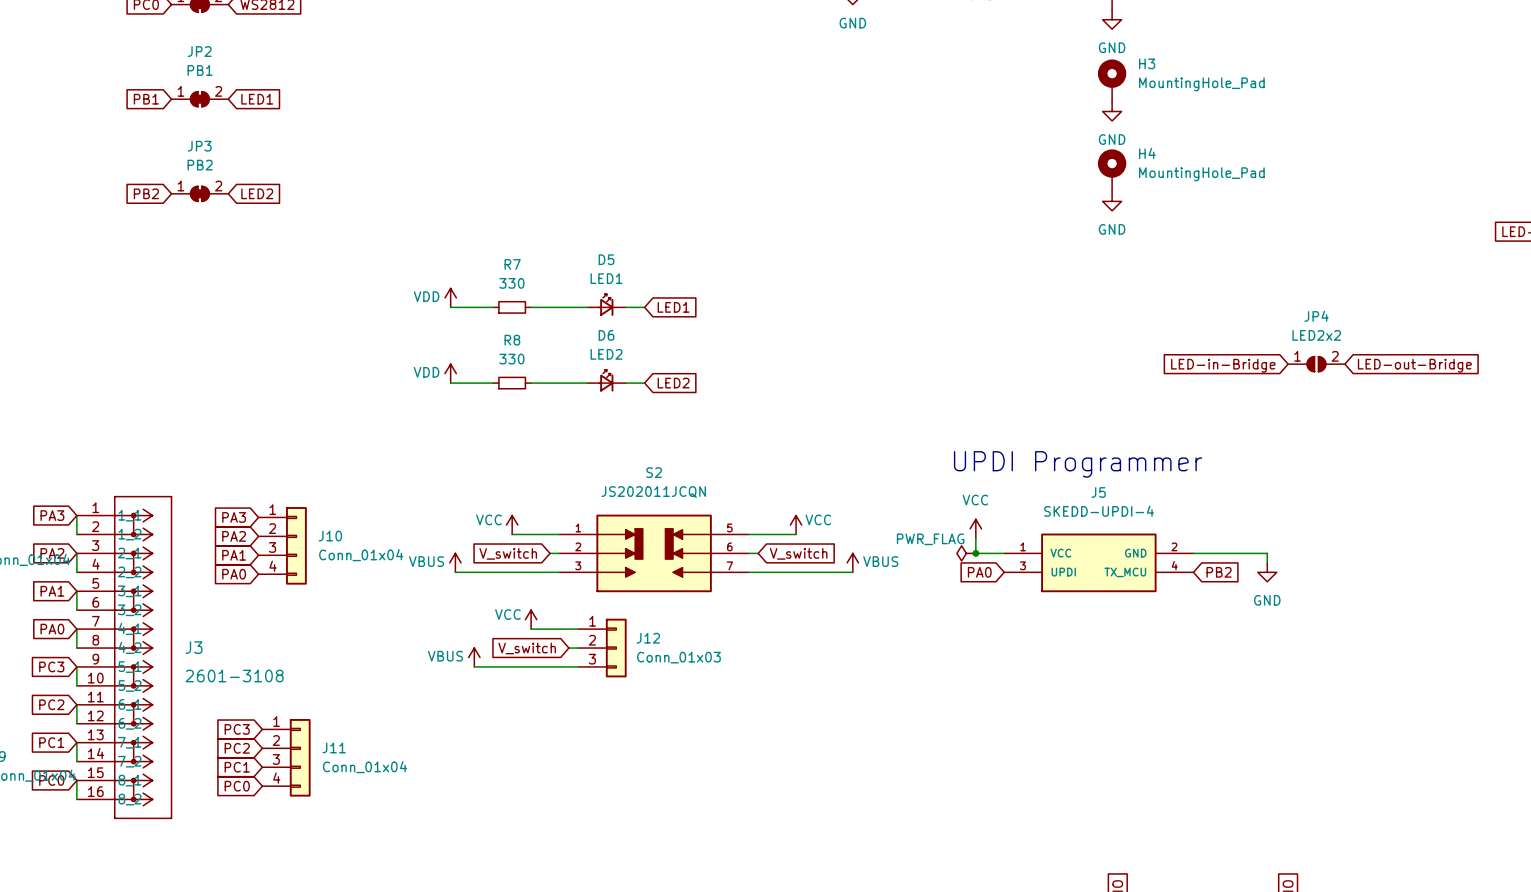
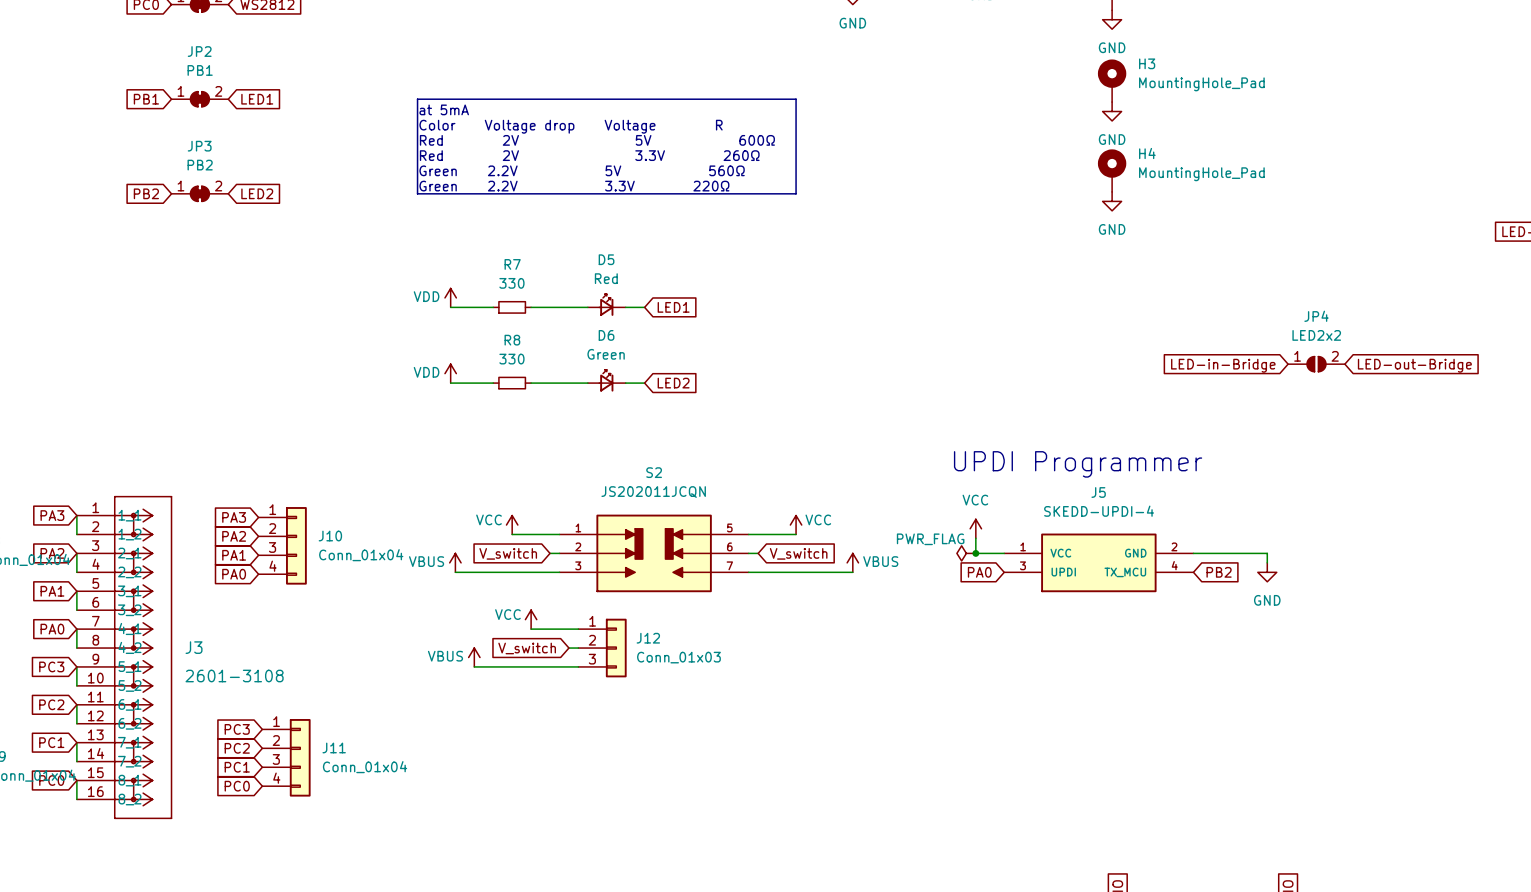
line: none -> (417, 99) (417, 193) (796, 193) (796, 99) (417, 99)
text: none -> at 5mA (444, 109)
text: none -> Color Voltage drop Voltage R (571, 126)
text: none -> Red 2V 5V 600Ω (597, 140)
text: none -> Red 2V 3.3V 260Ω (589, 155)
text: none -> Green 2.2V 5V 560Ω (582, 170)
text: none -> Green 2.2V 3.3V 220Ω (574, 186)
D5 value: LED1 (606, 278) -> Red (606, 278)
D6 value: LED2 (606, 354) -> Green (606, 354)

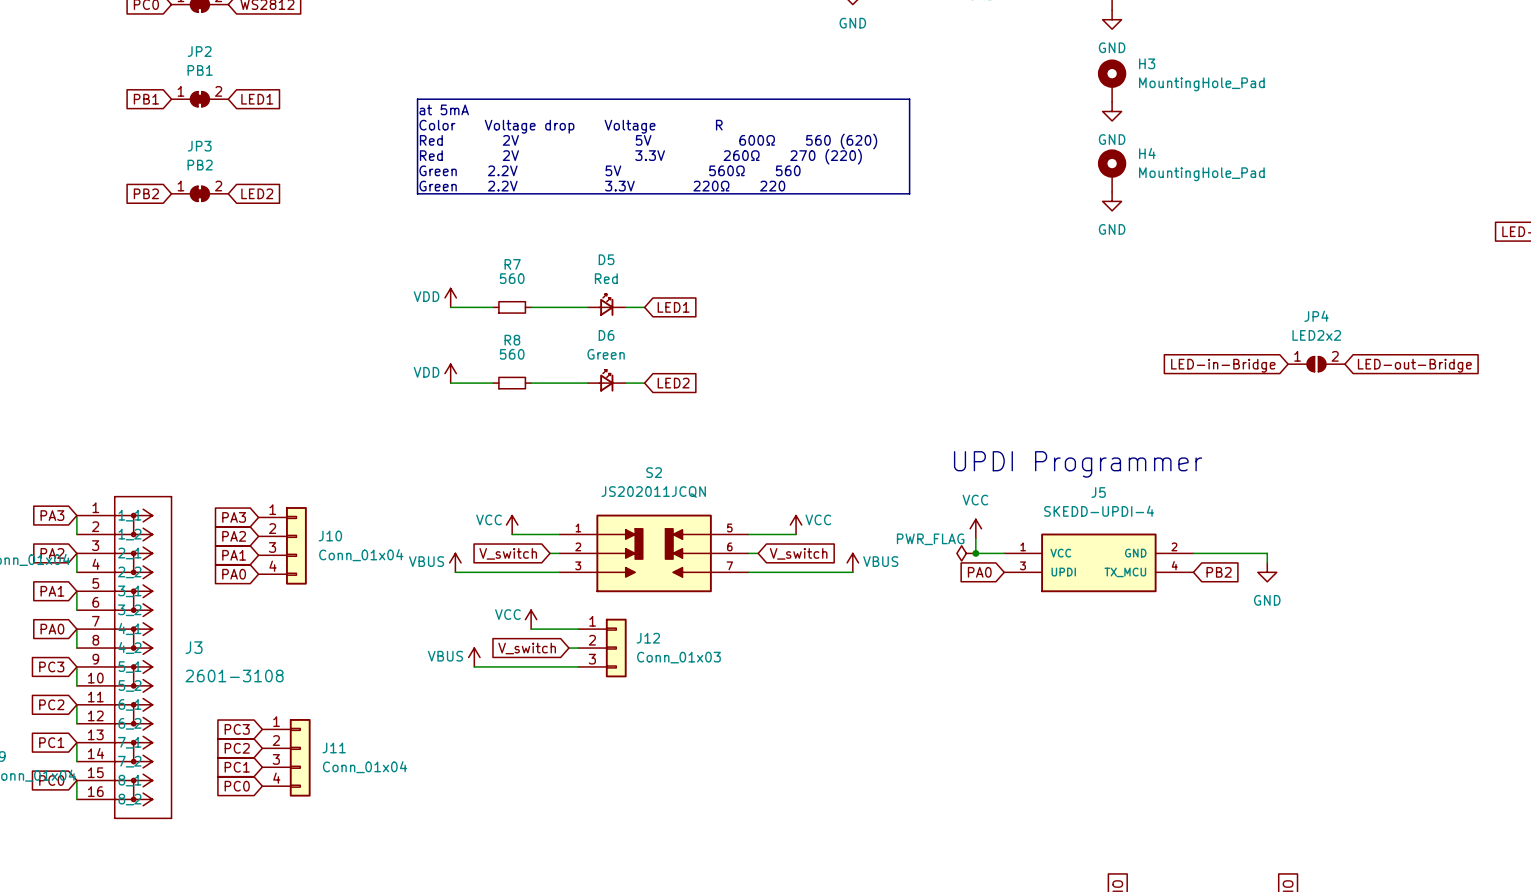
line: (796, 99) (796, 193) -> (796, 99) (909, 99) (909, 193) (796, 193)
text: Red 2V 5V 600Ω (597, 140) -> Red 2V 5V 600Ω 560 (620) (648, 141)
text: Red 2V 3.3V 260Ω (589, 155) -> Red 2V 3.3V 260Ω 270 (220) (640, 156)
text: Green 2.2V 5V 560Ω (582, 170) -> Green 2.2V 5V 560Ω 560 (610, 170)
text: Green 2.2V 3.3V 220Ω (574, 186) -> Green 2.2V 3.3V 220Ω 220 (602, 186)
R7 value: 330 (511, 283) -> 560 (512, 278)
R8 value: 330 (511, 359) -> 560 (512, 354)

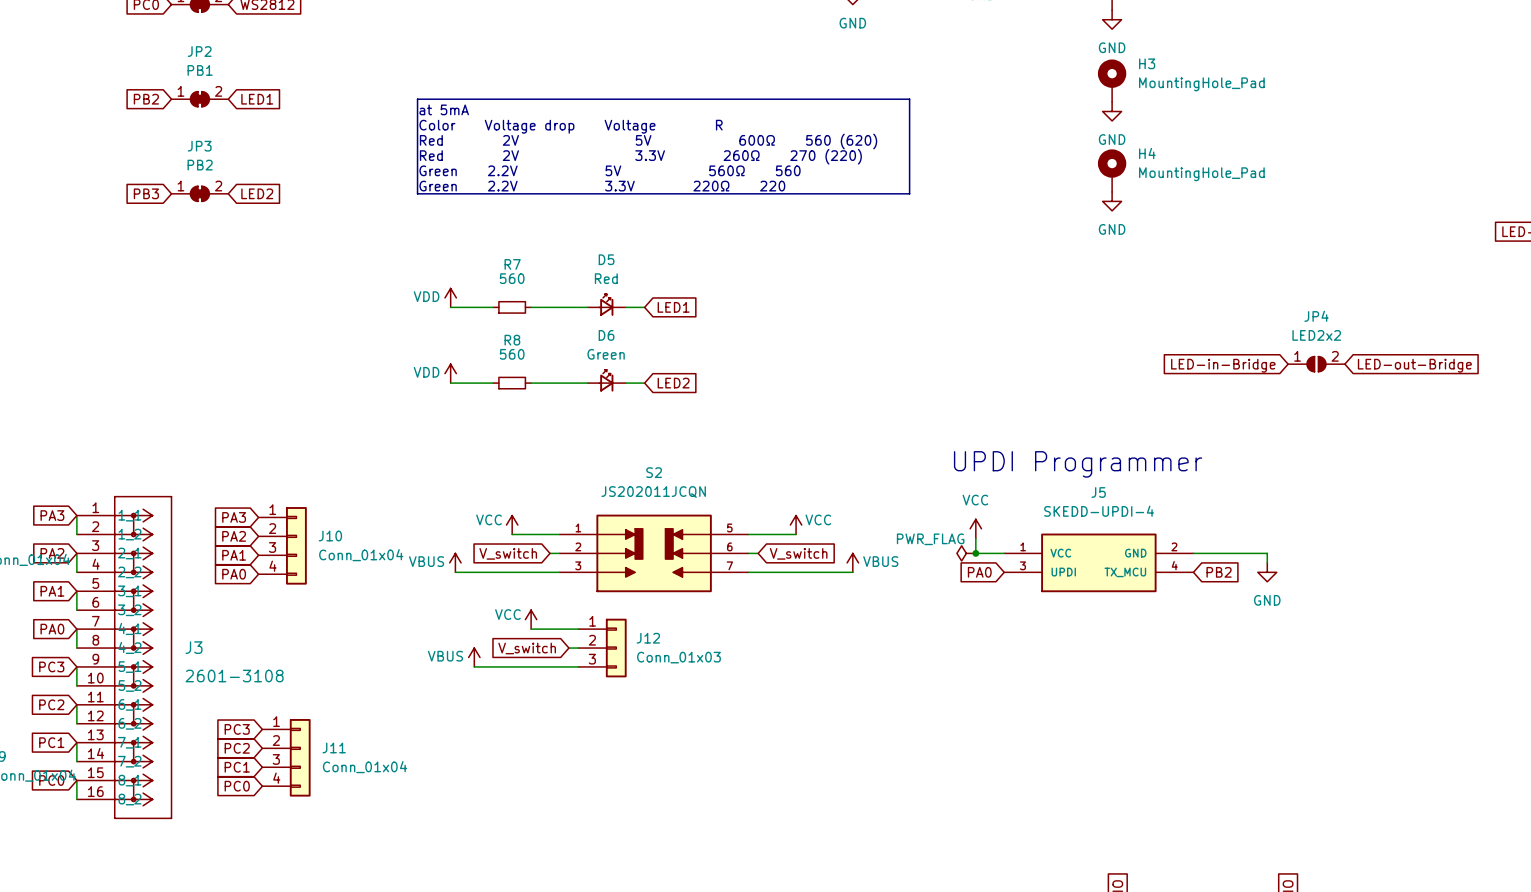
global label: PB1 (146, 99) -> PB2 (146, 99)
global label: PB2 (146, 193) -> PB3 (146, 193)

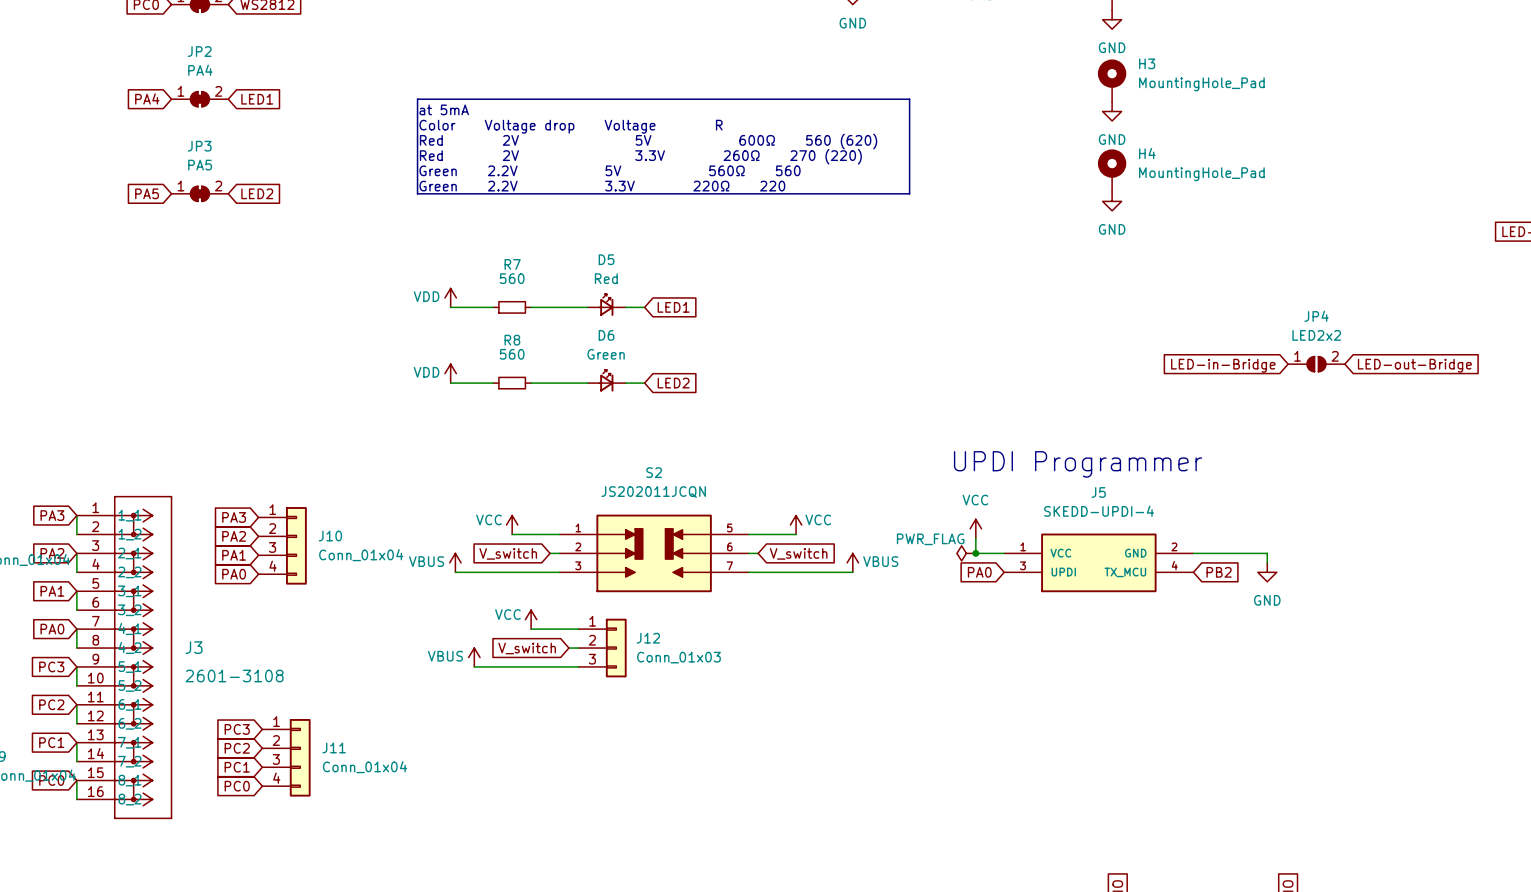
JP2 value: PB1 (200, 70) -> PA4 (200, 70)
global label: PB2 (146, 99) -> PA4 (147, 98)
JP3 value: PB2 (200, 165) -> PA5 (200, 165)
global label: PB3 (146, 193) -> PA5 (147, 193)

